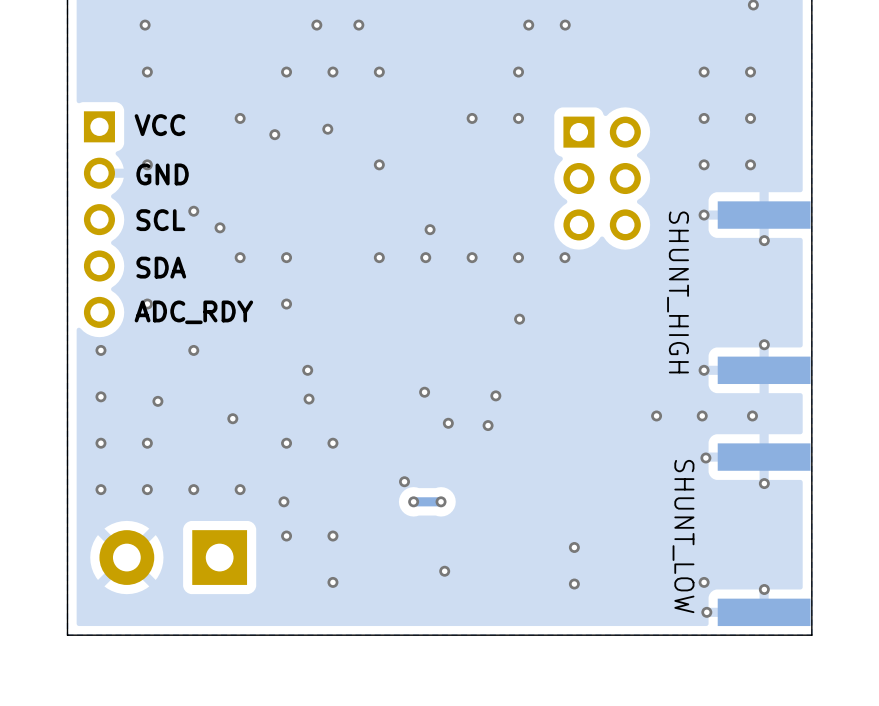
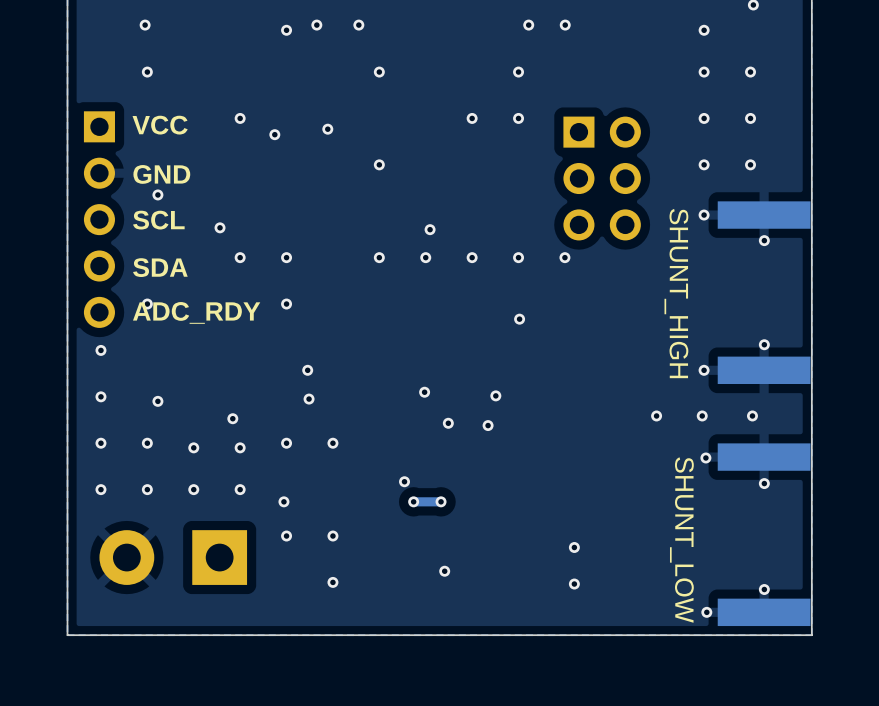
via: none -> (286, 30)
via: none -> (704, 30)
via: (286, 72) -> none
via: (332, 72) -> none
via: (147, 164) -> none
via: none -> (157, 194)
via: (193, 211) -> none
via: (193, 350) -> none
via: none -> (193, 447)
via: none -> (240, 447)
via: (704, 582) -> none

